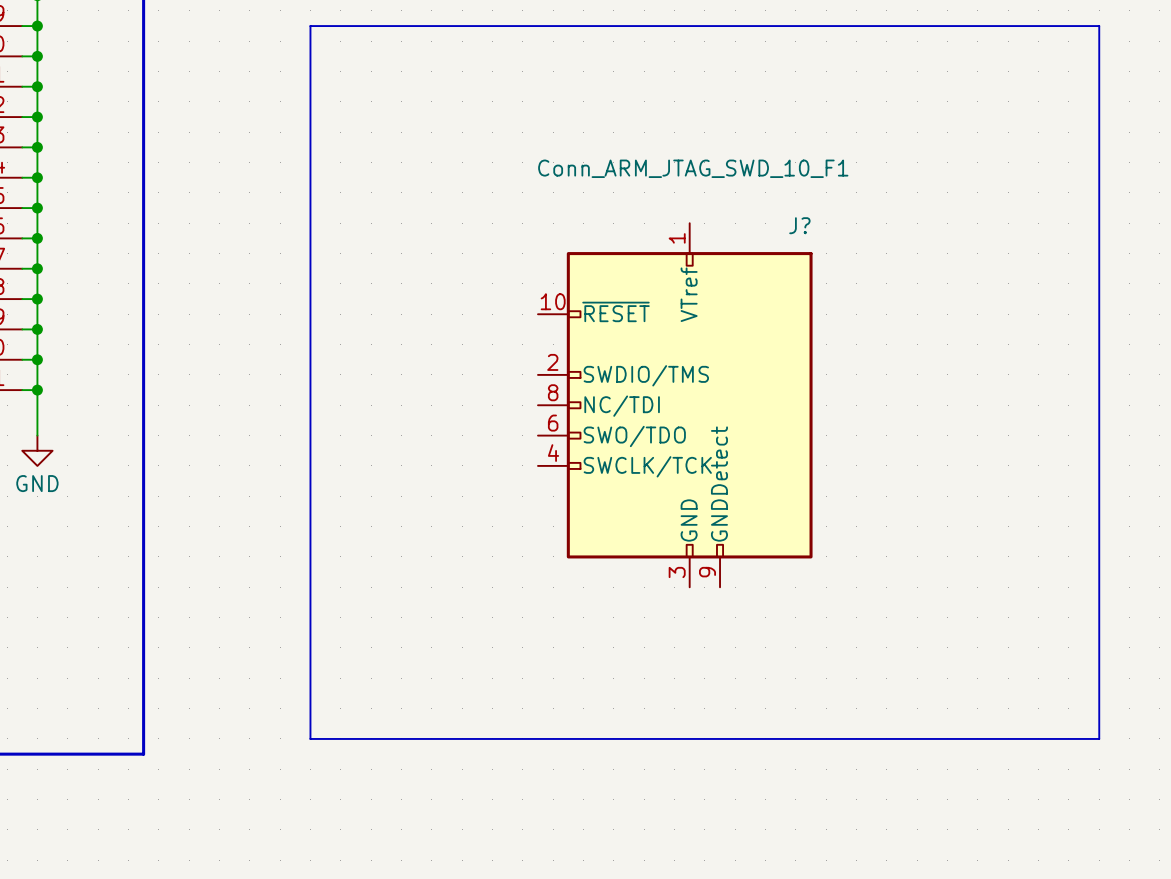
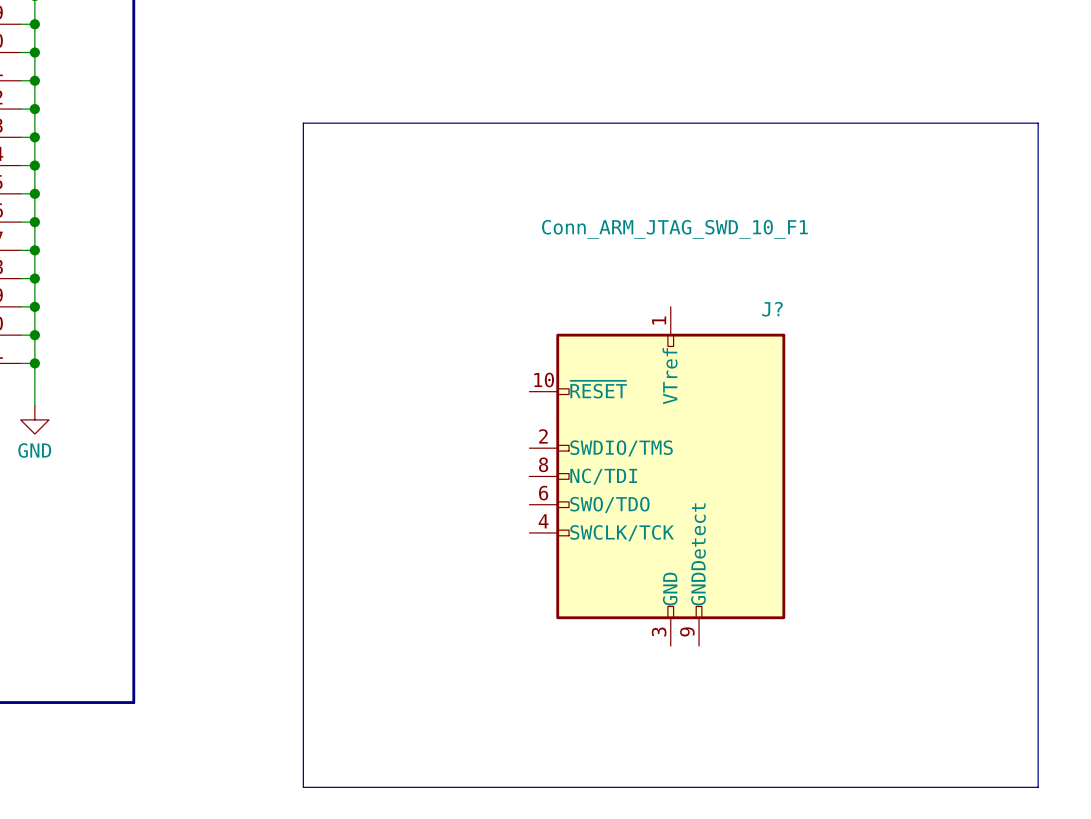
line: (310, 26) (1099, 26) (1099, 738) (310, 738) (310, 26) -> (303, 123) (1038, 123) (1038, 787) (303, 787) (303, 123)
J? value position: Conn_ARM_JTAG_SWD_10_F1 (693, 168) -> Conn_ARM_JTAG_SWD_10_F1 (674, 229)
J? position: (675, 405) -> (657, 476)

